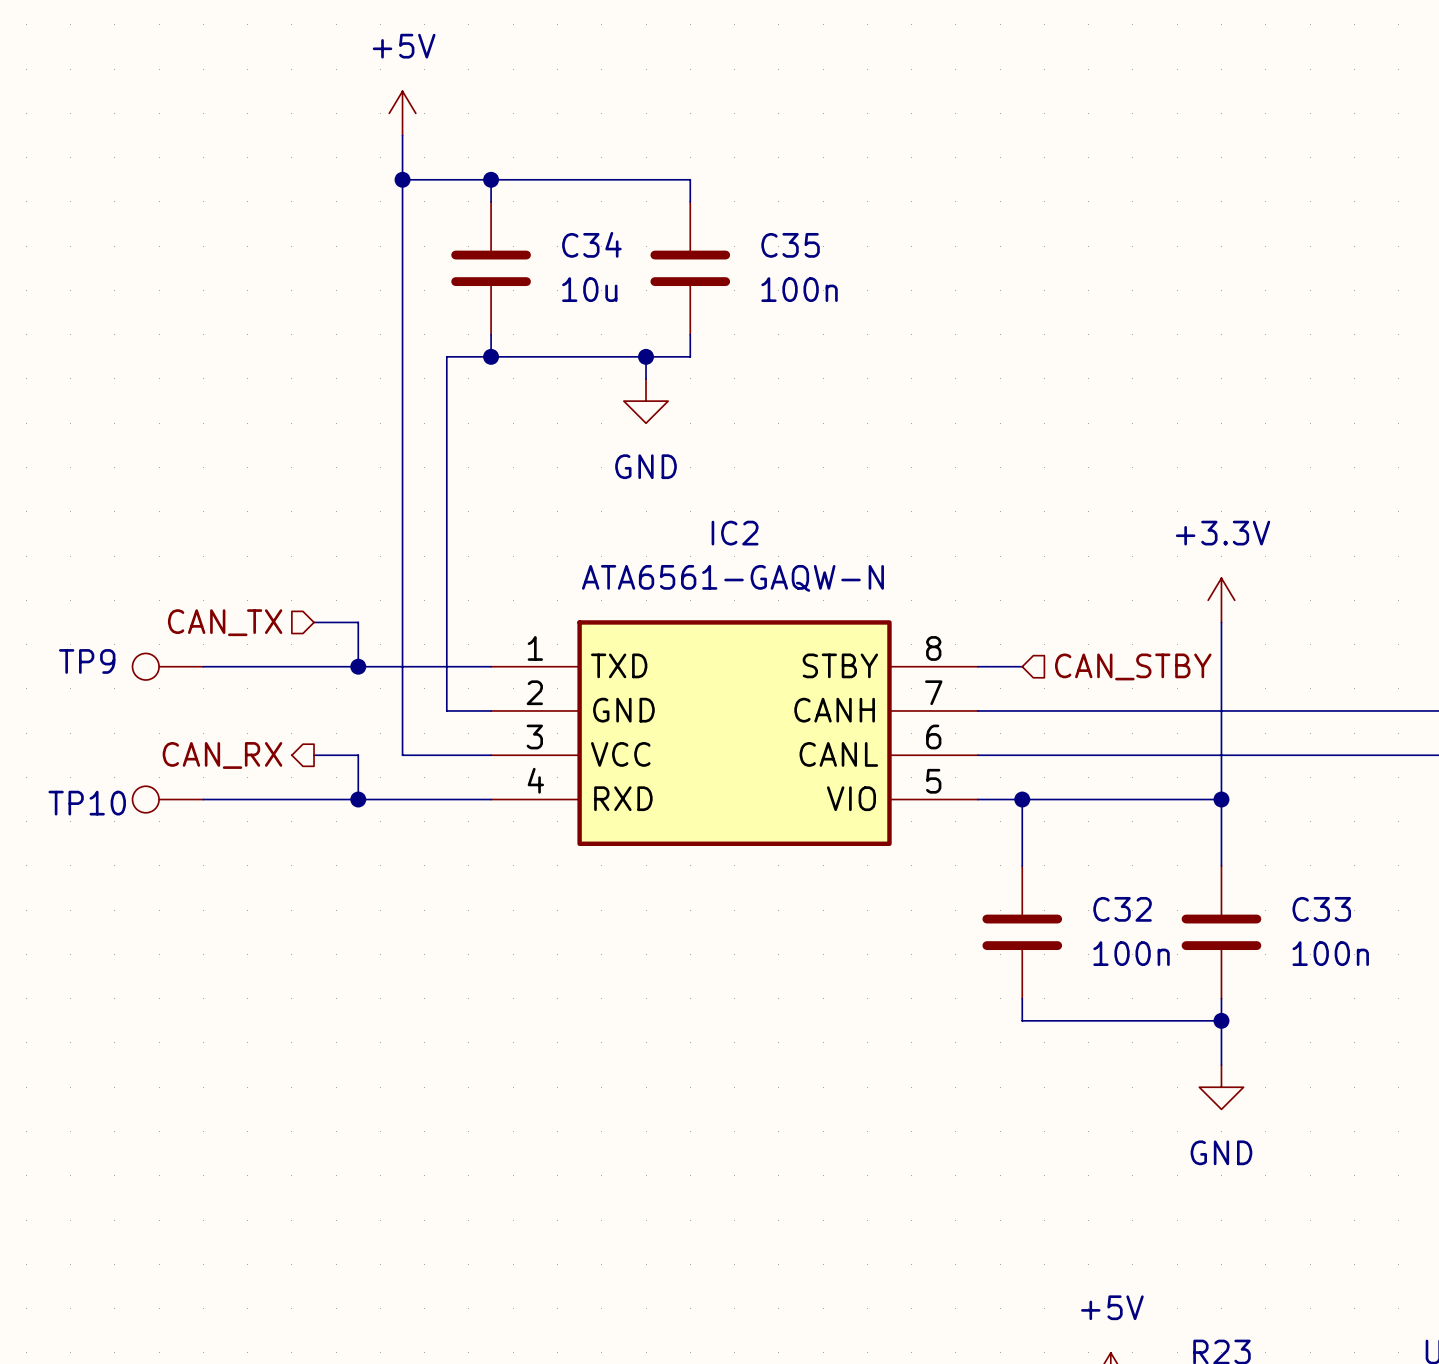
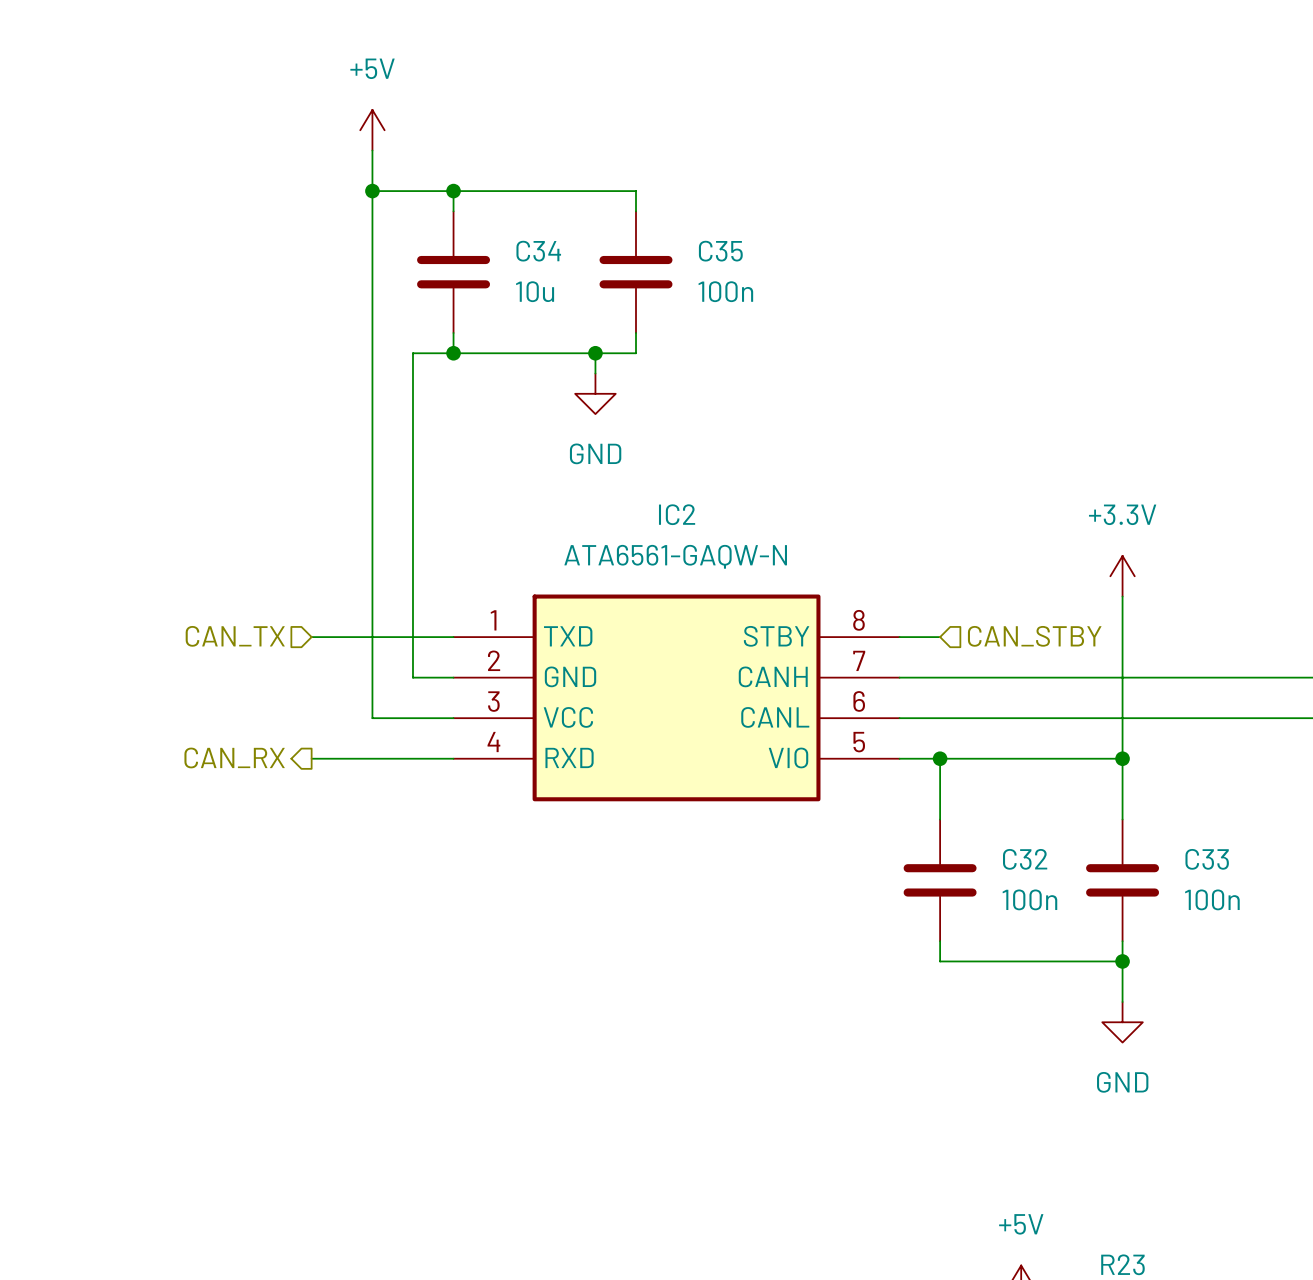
hierarchical label position: CAN_TX (225, 622) -> CAN_TX (235, 636)
wire: (314, 622) (358, 622) (358, 666) -> none
TP9: (167, 666) -> none
wire: (203, 666) (336, 666) -> none
junction: (358, 666) -> none
hierarchical label position: CAN_RX (222, 755) -> CAN_RX (234, 757)
wire: (314, 755) (358, 755) (358, 799) -> none
TP10: (167, 799) -> none
wire: (203, 799) (336, 799) -> none
junction: (358, 799) -> none

